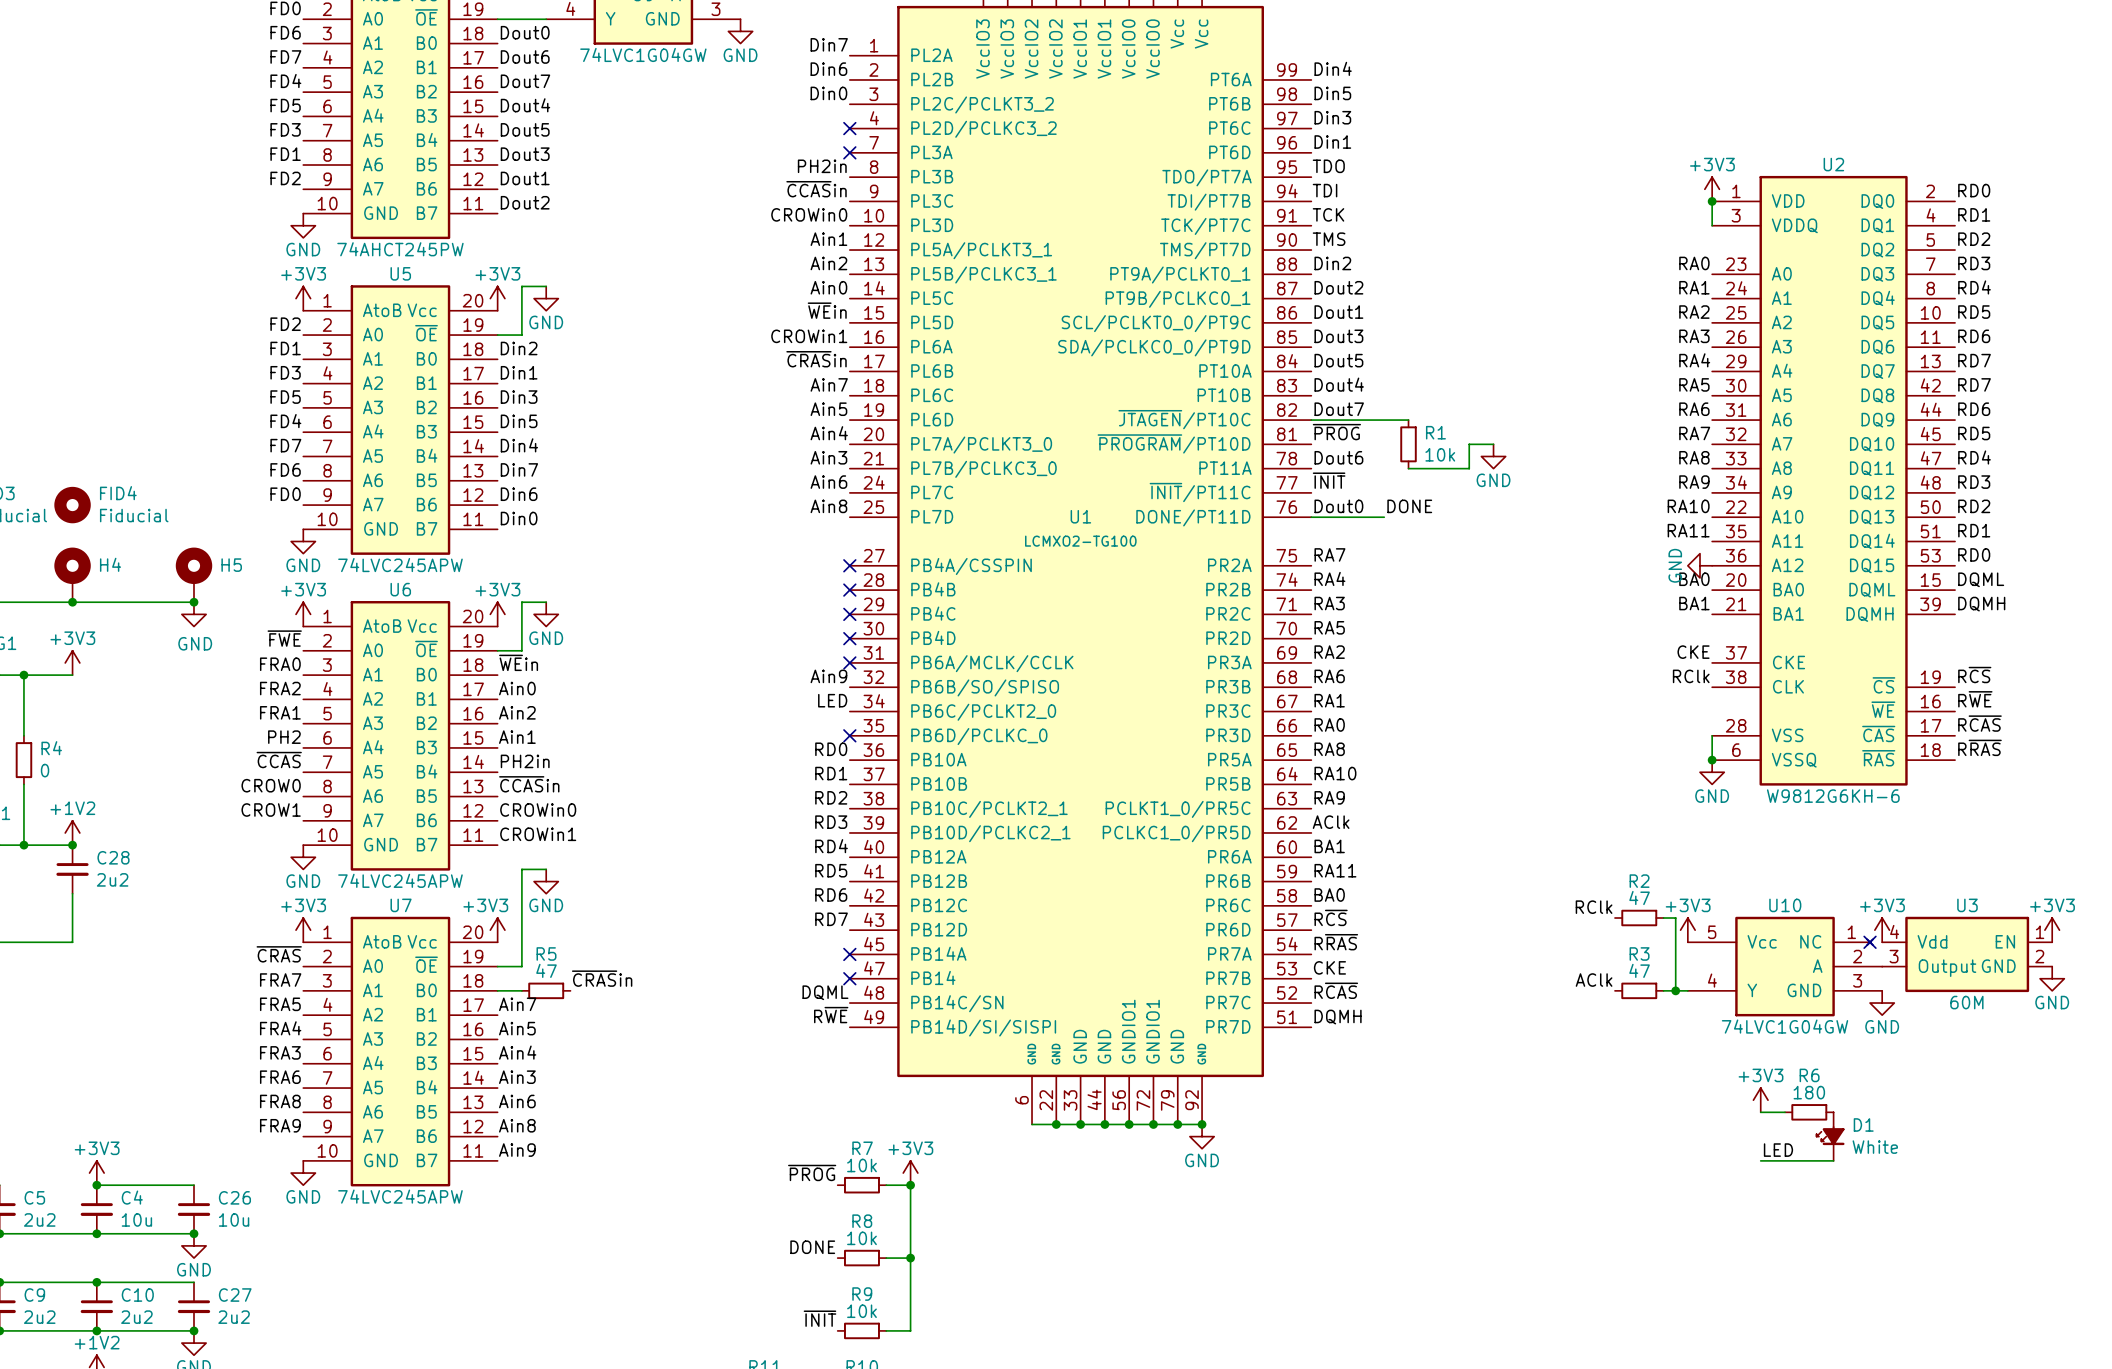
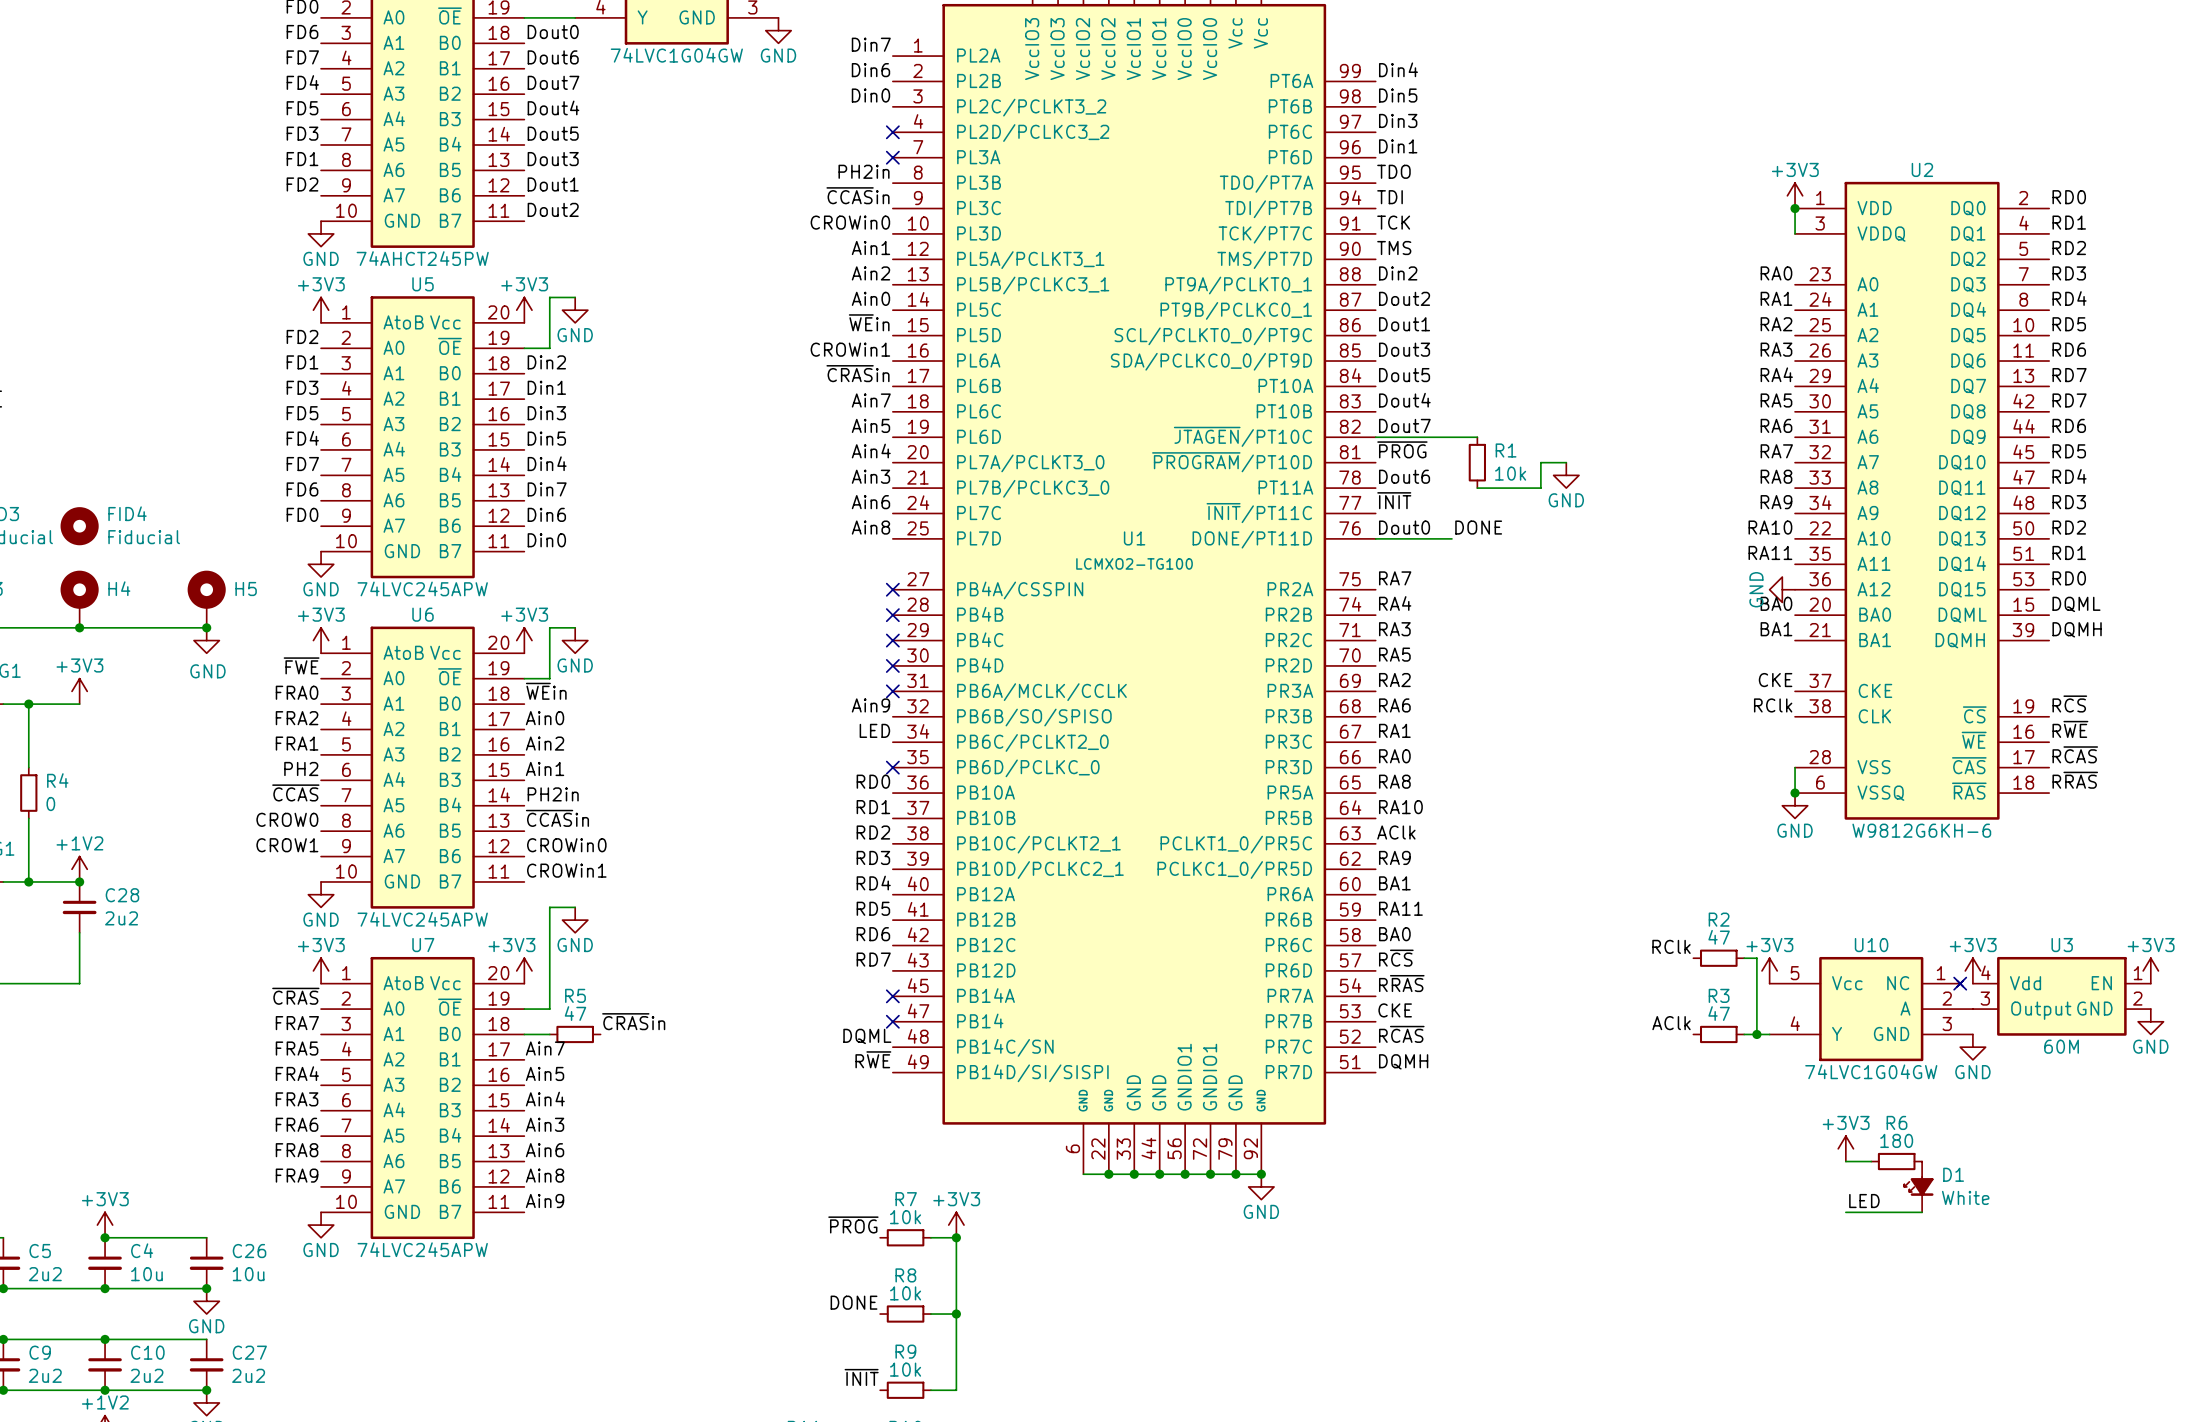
label: RA9 (1329, 797) -> AClk (1396, 832)
label: AClk (1331, 822) -> RA9 (1394, 857)

